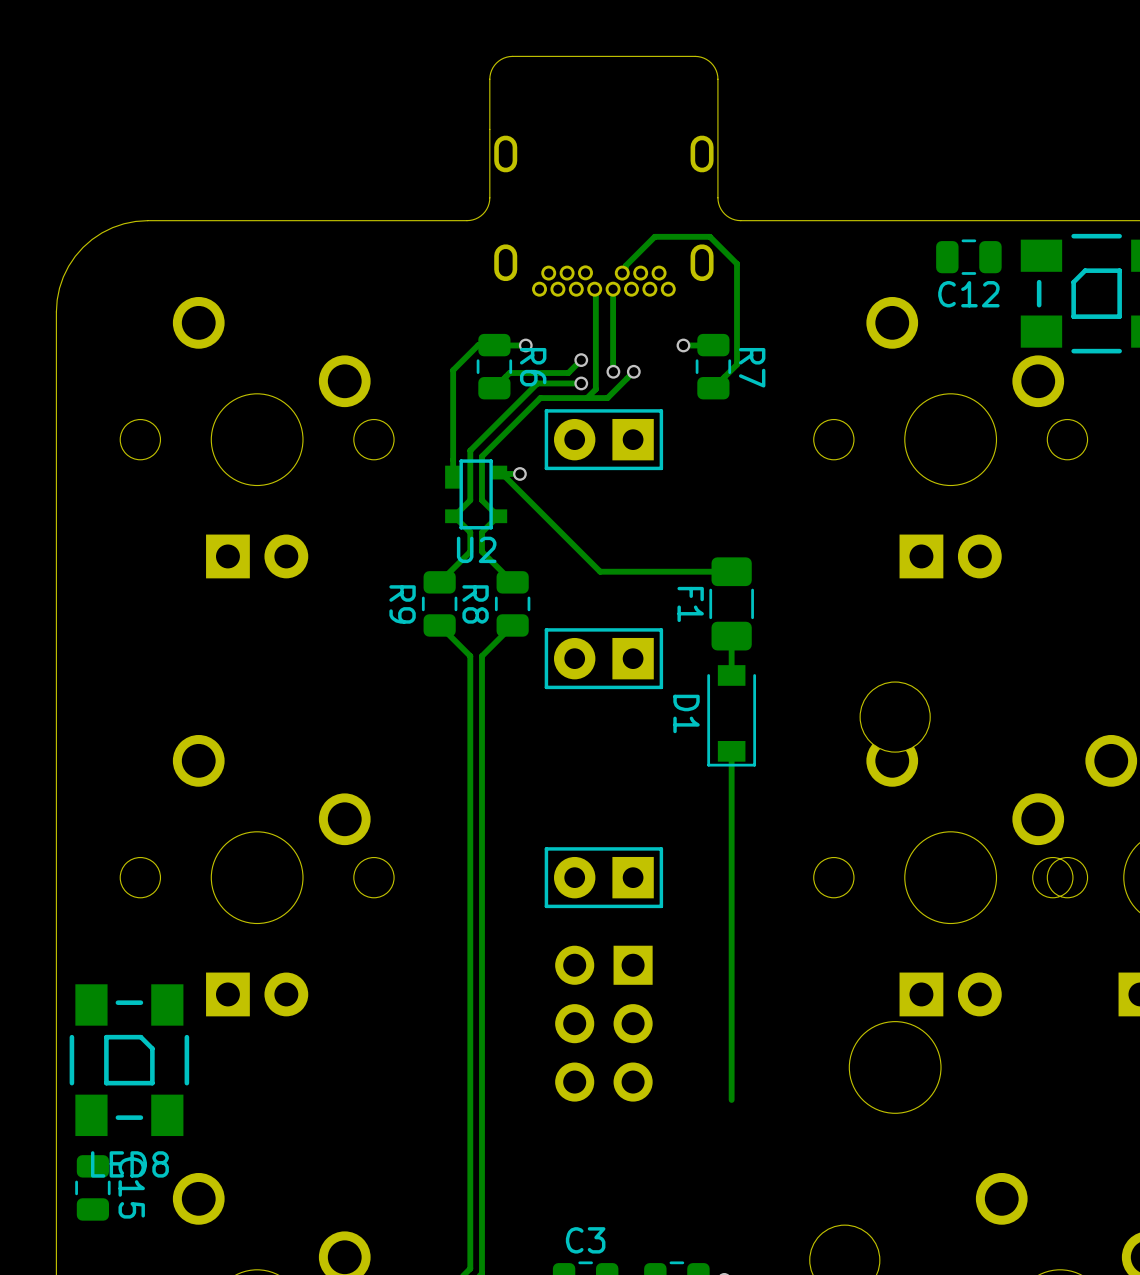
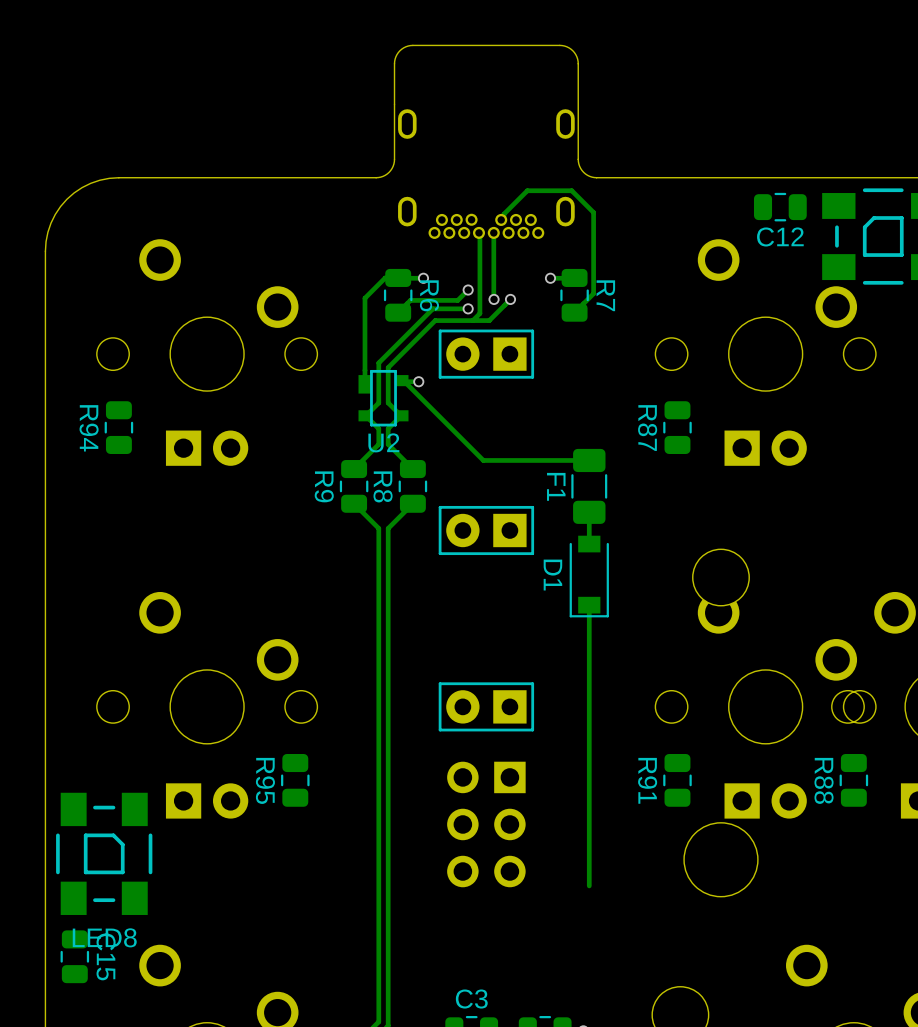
R94: none -> (118, 427)
R87: none -> (677, 427)
R95: none -> (295, 780)
R91: none -> (677, 780)
R88: none -> (853, 780)

